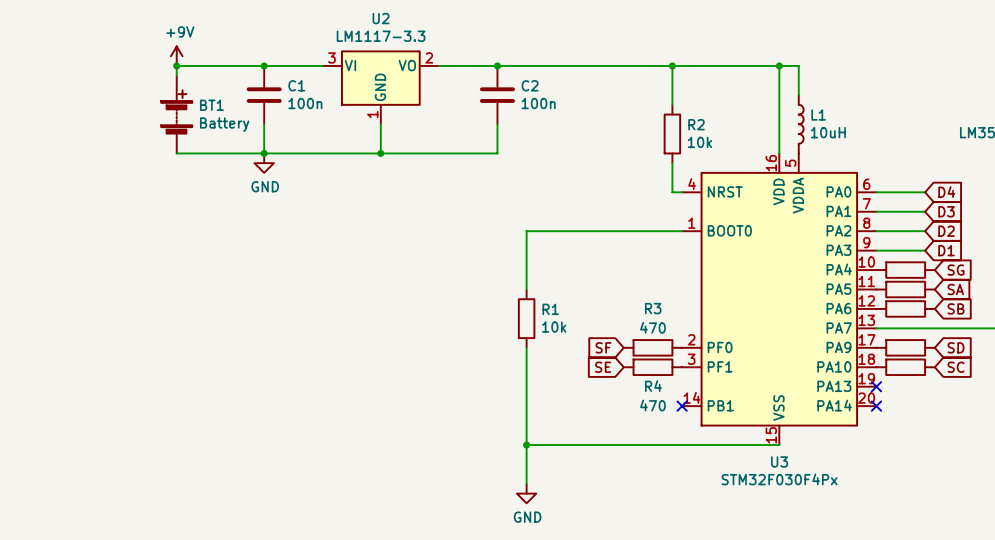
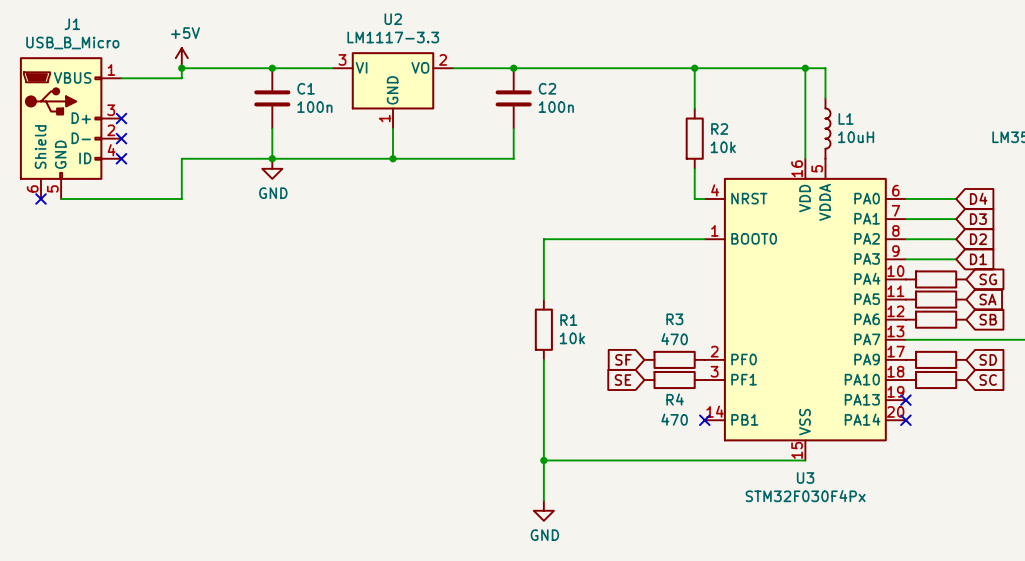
power symbol: +9V (176, 56) -> +5V (181, 58)
wire: none -> (121, 78) (181, 78)
no-connect mark: none -> (121, 118)
BT1: Battery (176, 114) -> none
J1: none -> USB_B_Micro (70, 128)
no-connect mark: none -> (121, 138)
no-connect mark: none -> (121, 158)
wire: none -> (181, 158) (181, 198) (61, 198)
no-connect mark: none -> (41, 198)

